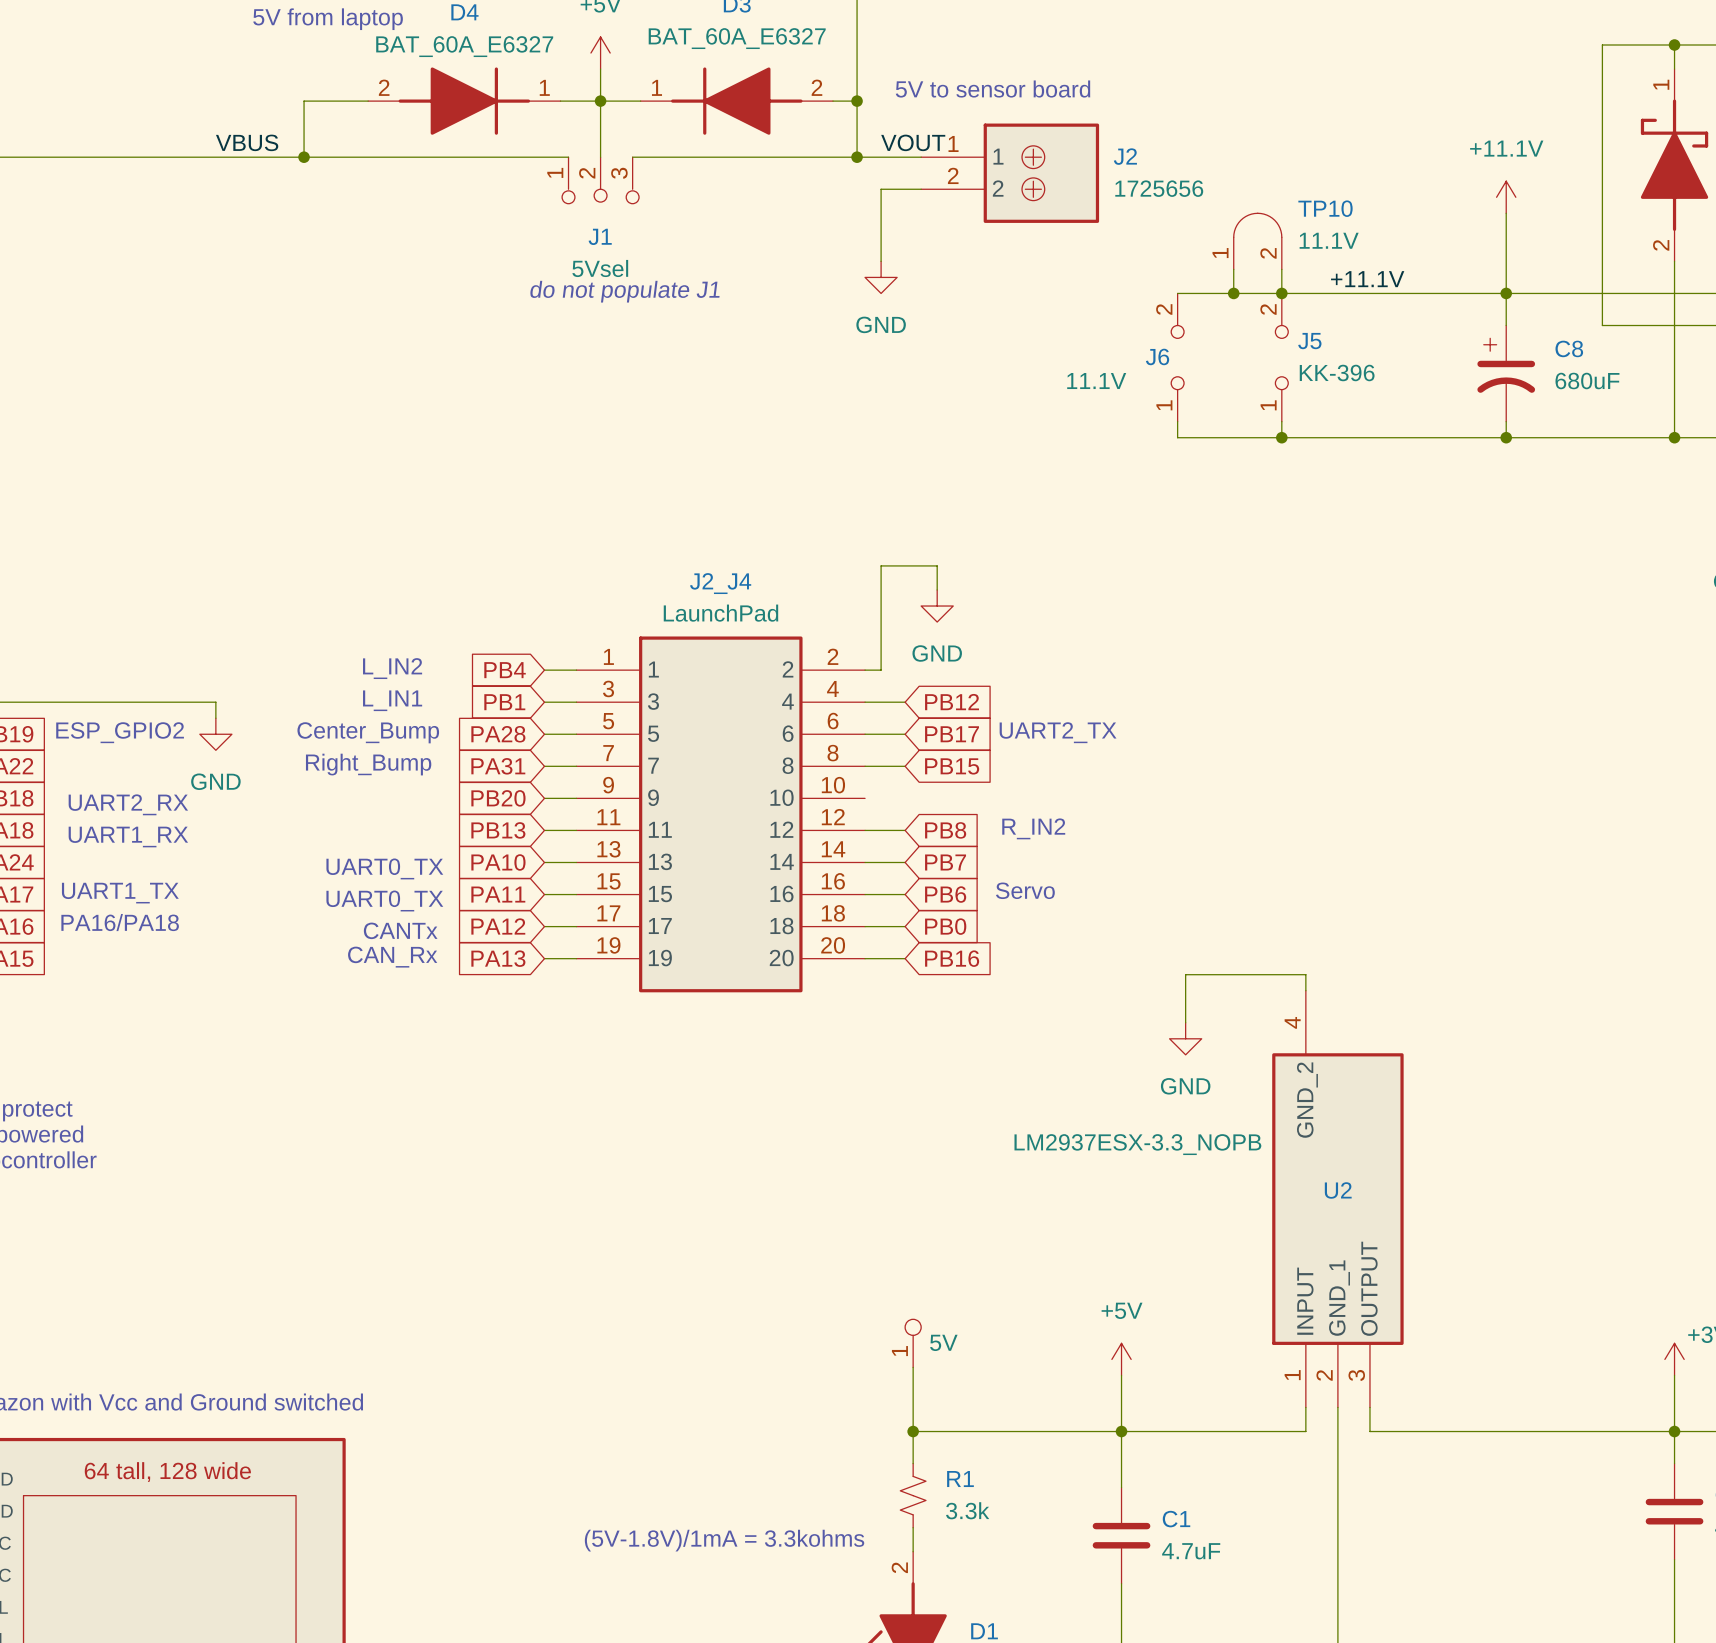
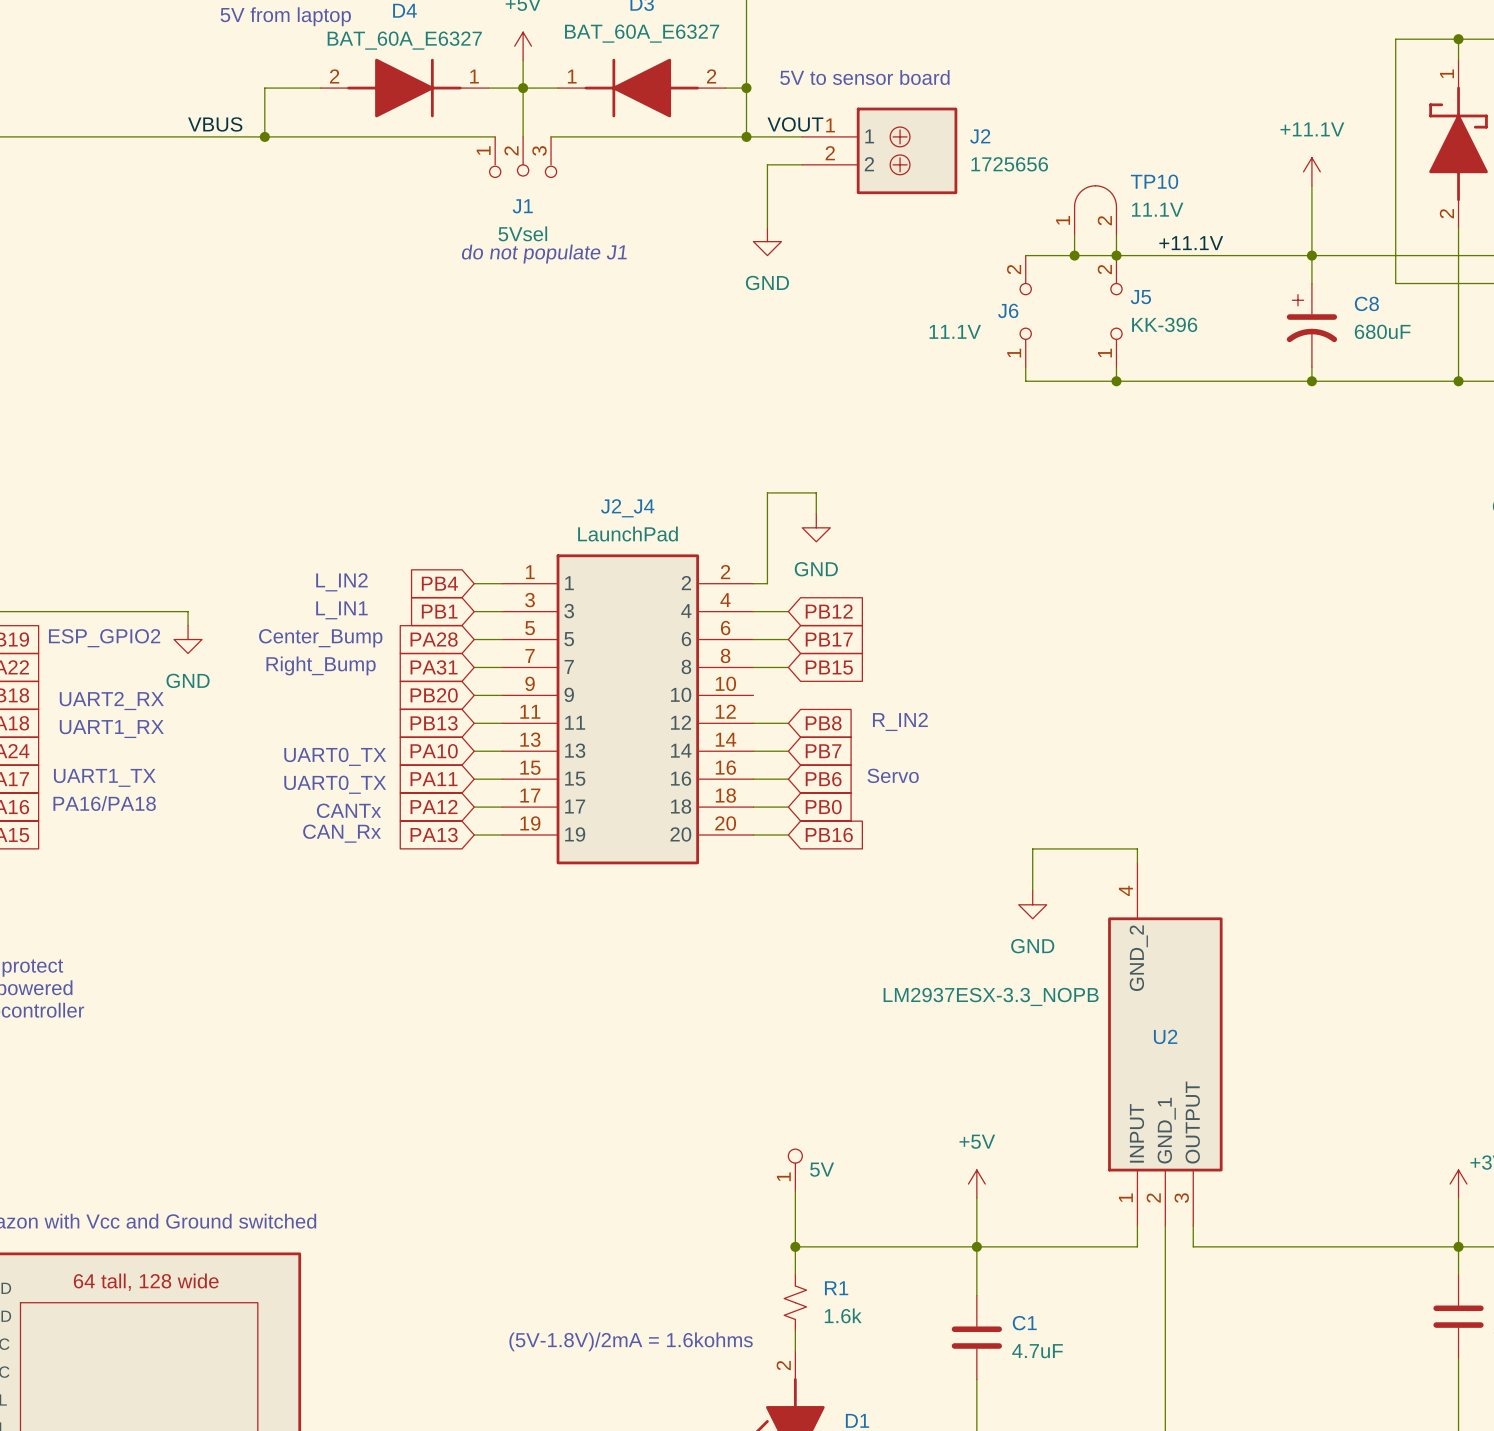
text: UART2_TX (1058, 732) -> none
R1 value: 3.3k (967, 1510) -> 1.6k (843, 1315)
text: (5V-1.8V)/1mA = 3.3kohms (724, 1540) -> (5V-1.8V)/2mA = 1.6kohms (631, 1341)

